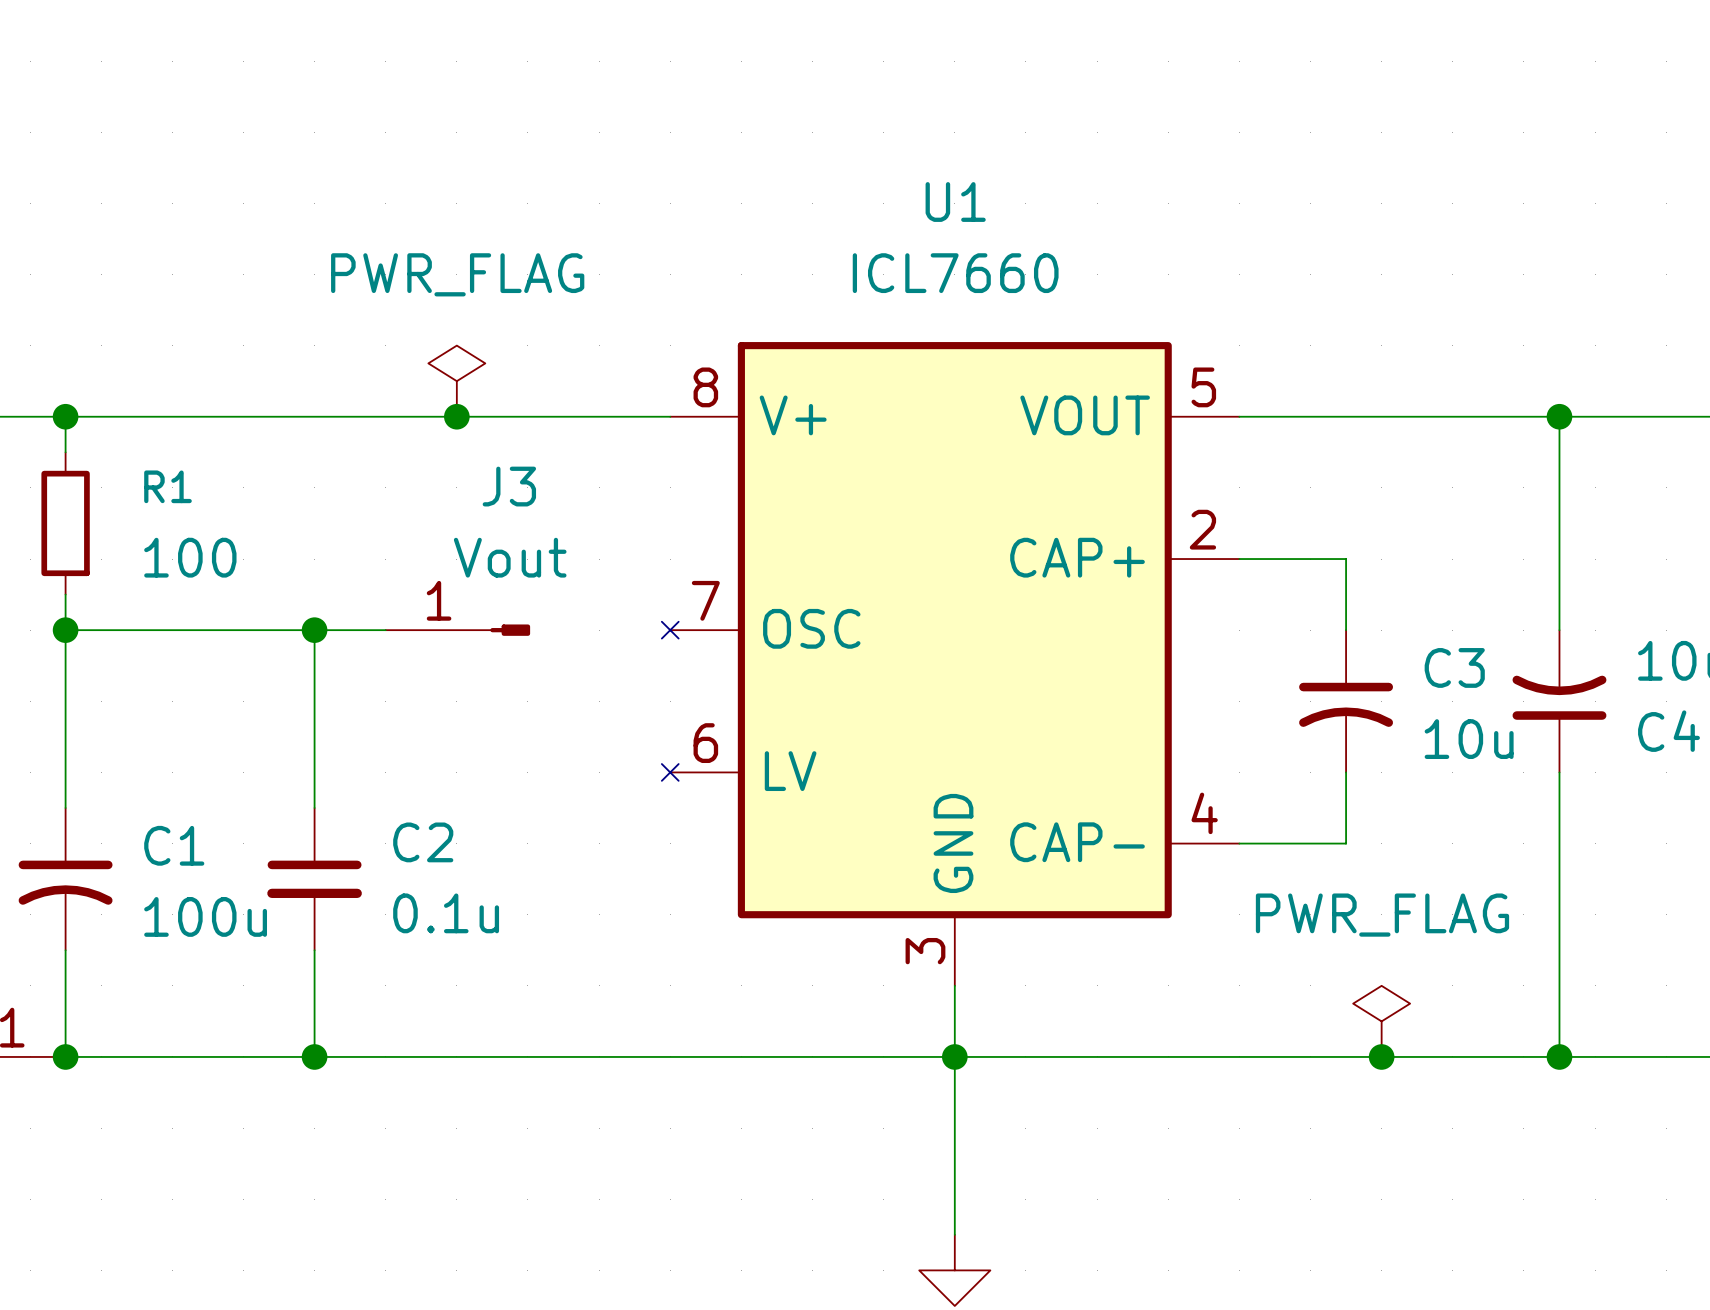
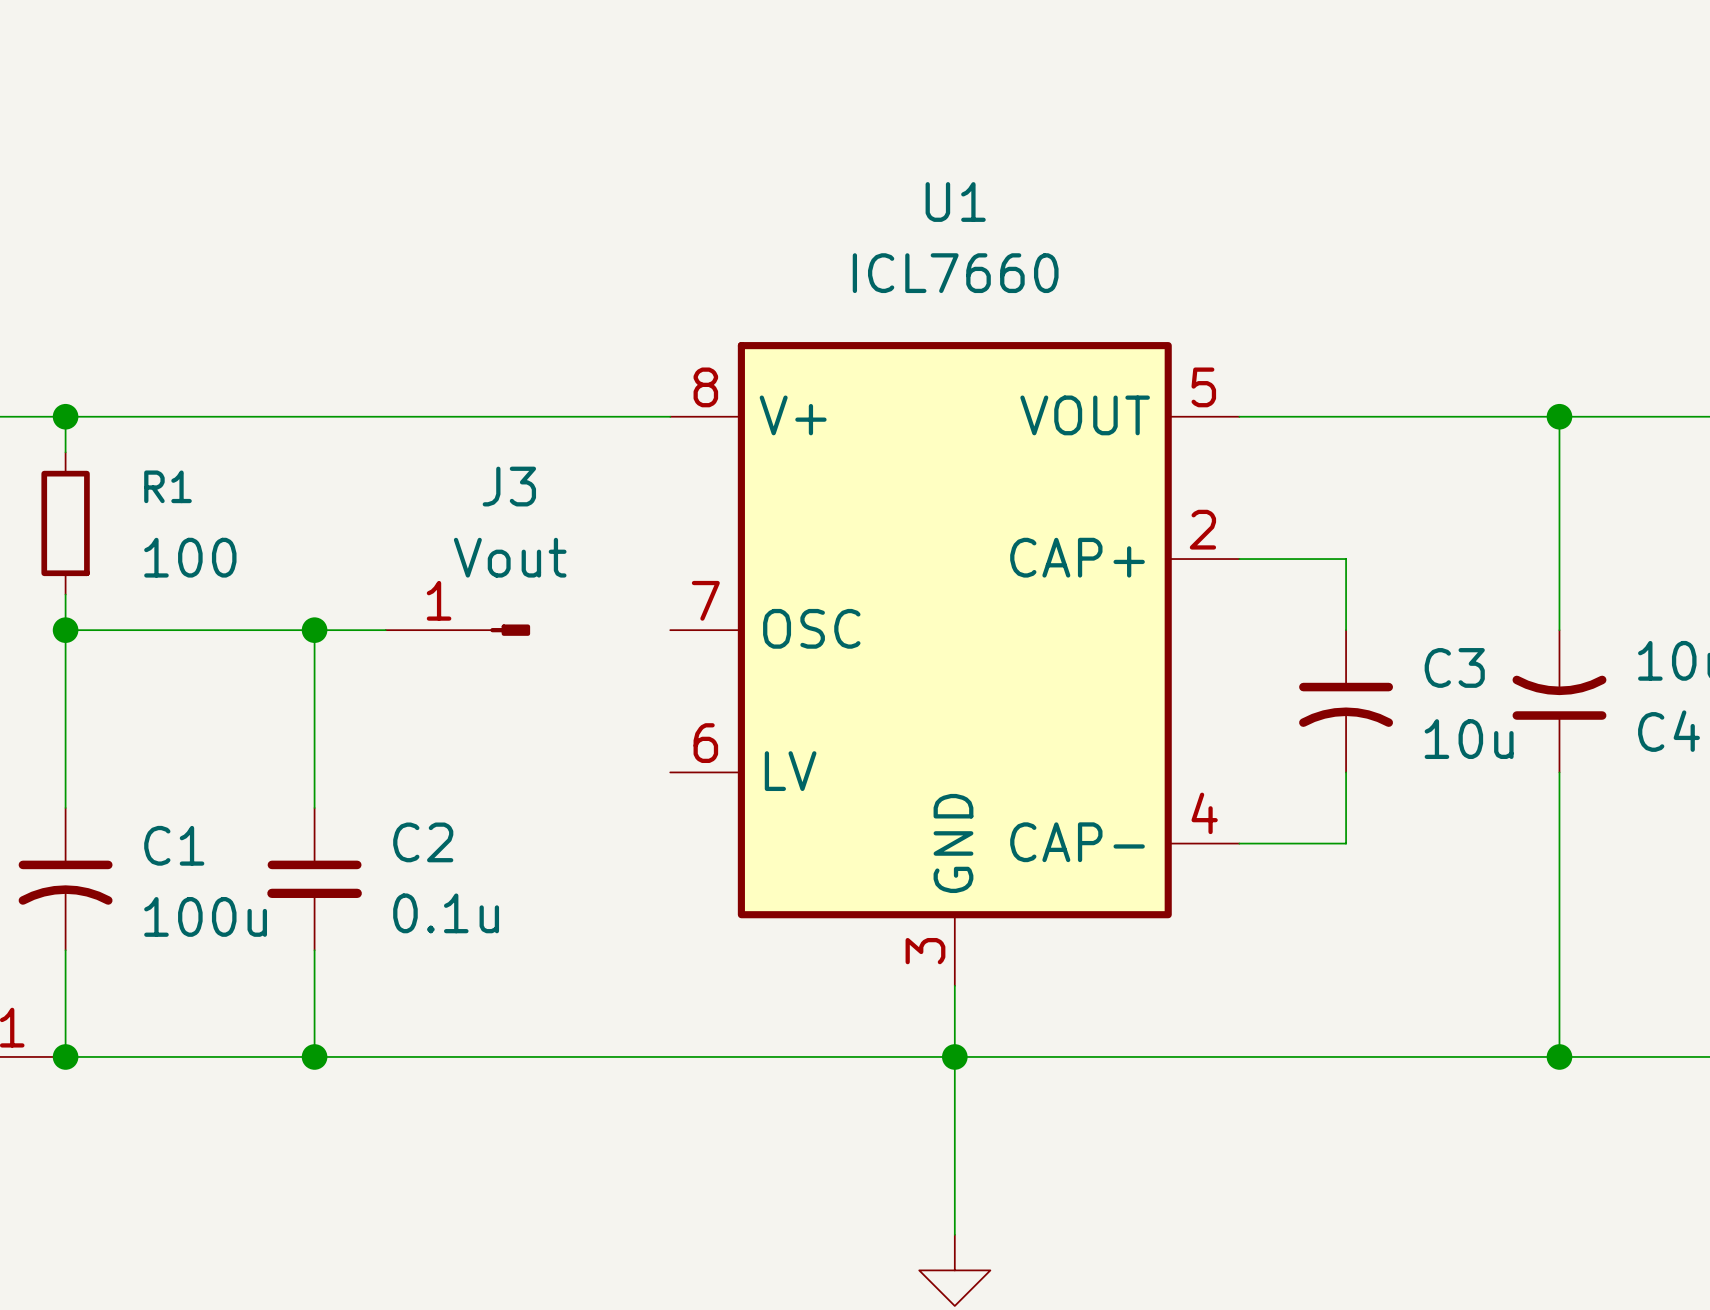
U1 symbol: [661, 342, 1240, 986] -> [670, 342, 1240, 986]
power symbol: PWR_FLAG (456, 381) -> none
junction: (456, 416) -> none
power symbol: PWR_FLAG (1381, 1021) -> none
junction: (1381, 1056) -> none

